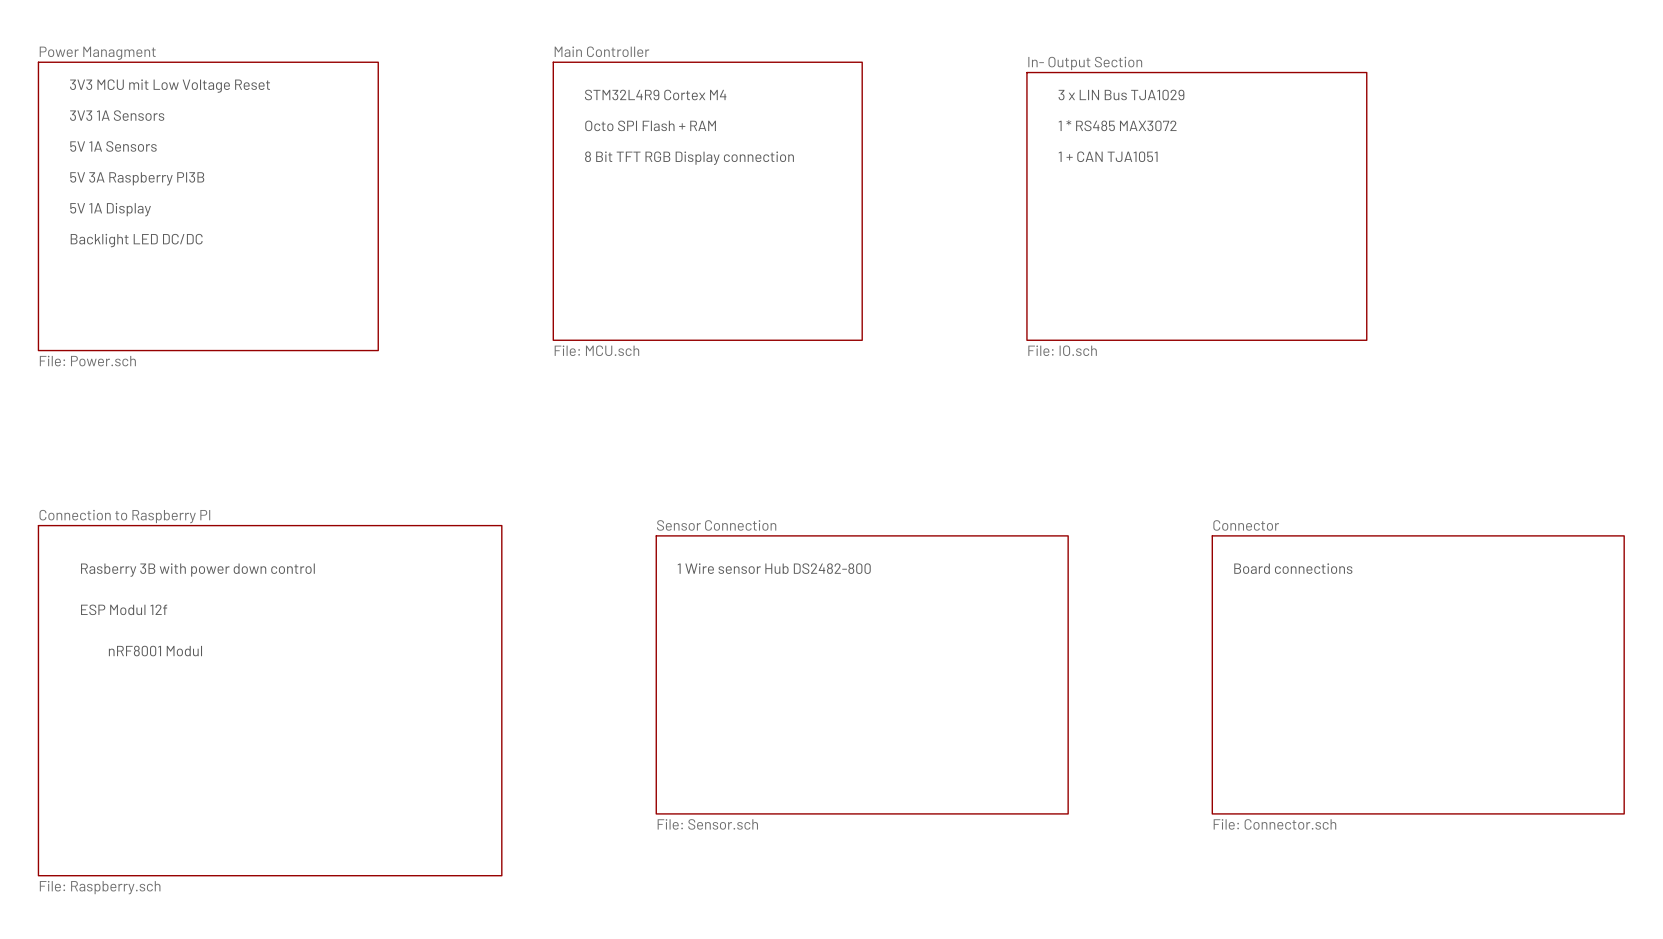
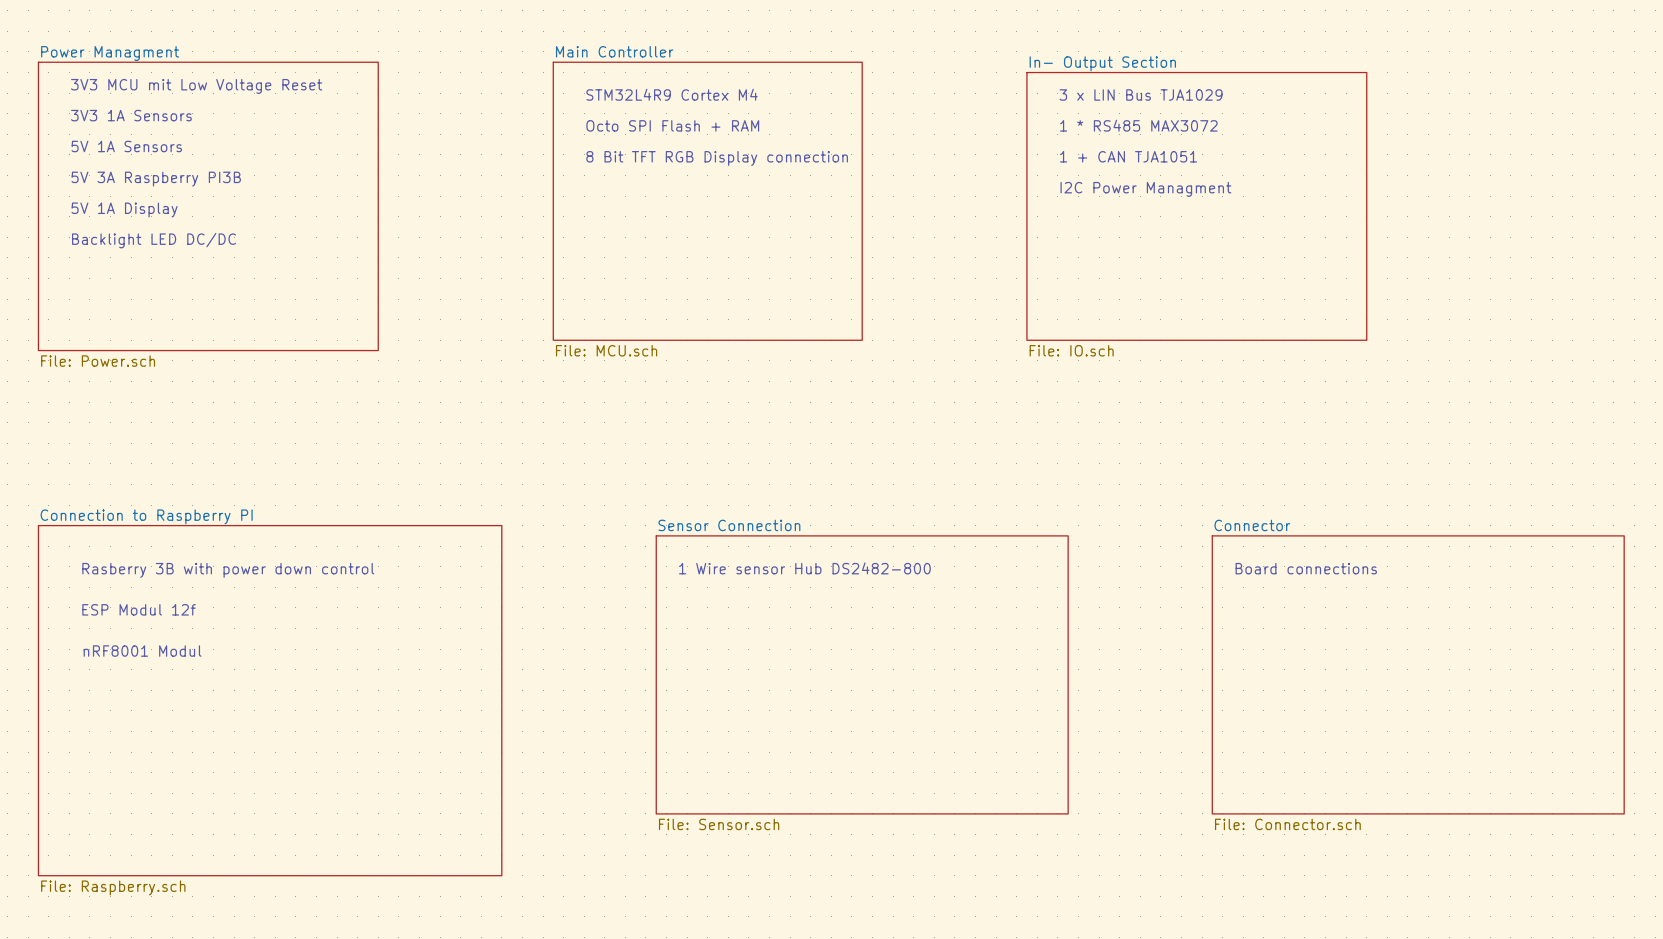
text: none -> I2C Power Managment (1145, 189)

